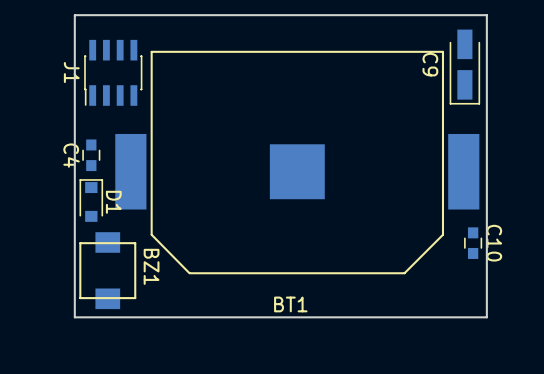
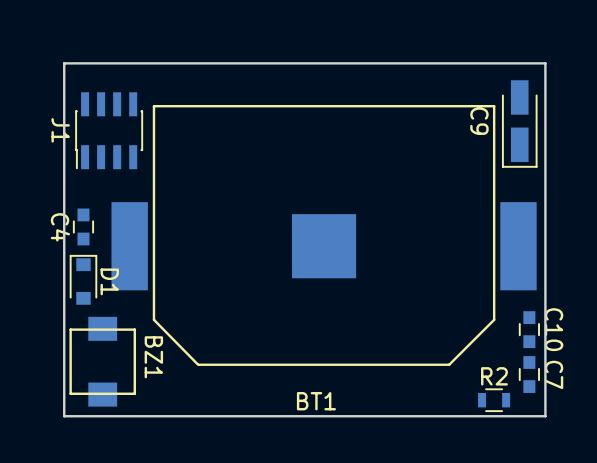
C7: none -> (529, 374)
R2: none -> (494, 400)

